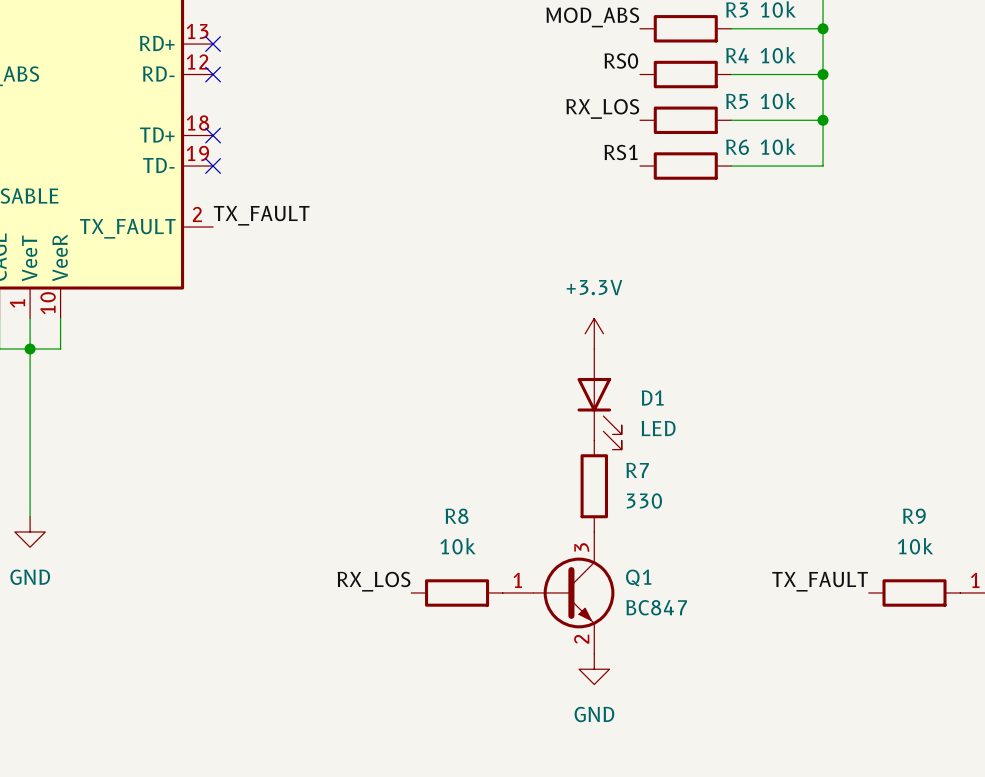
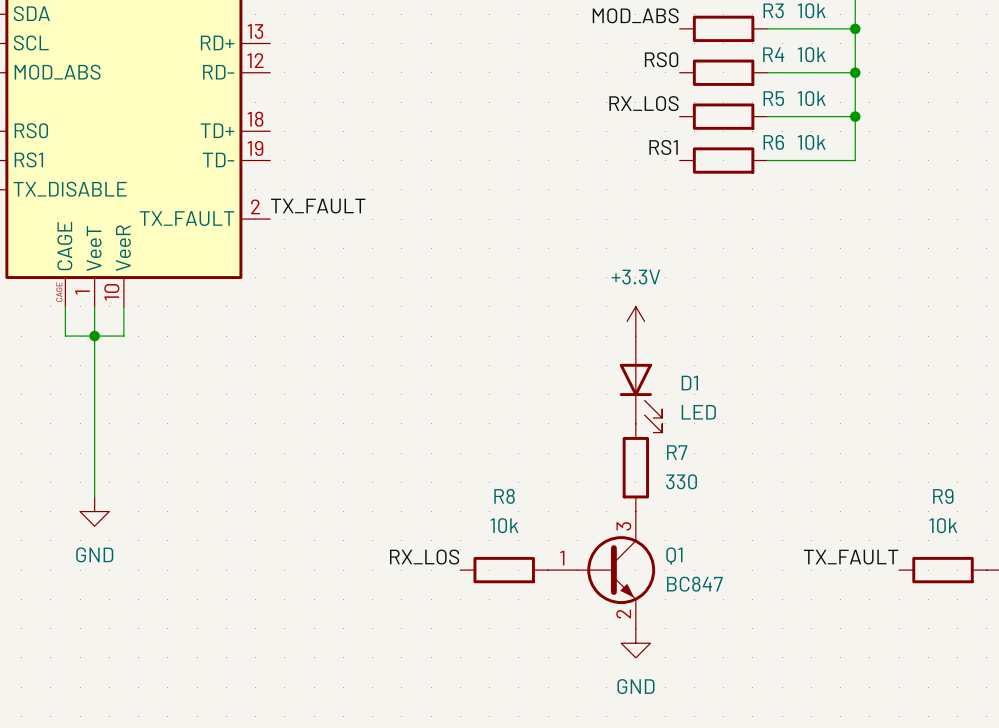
no-connect mark: (213, 44) -> none
no-connect mark: (213, 74) -> none
no-connect mark: (213, 135) -> none
no-connect mark: (213, 166) -> none

